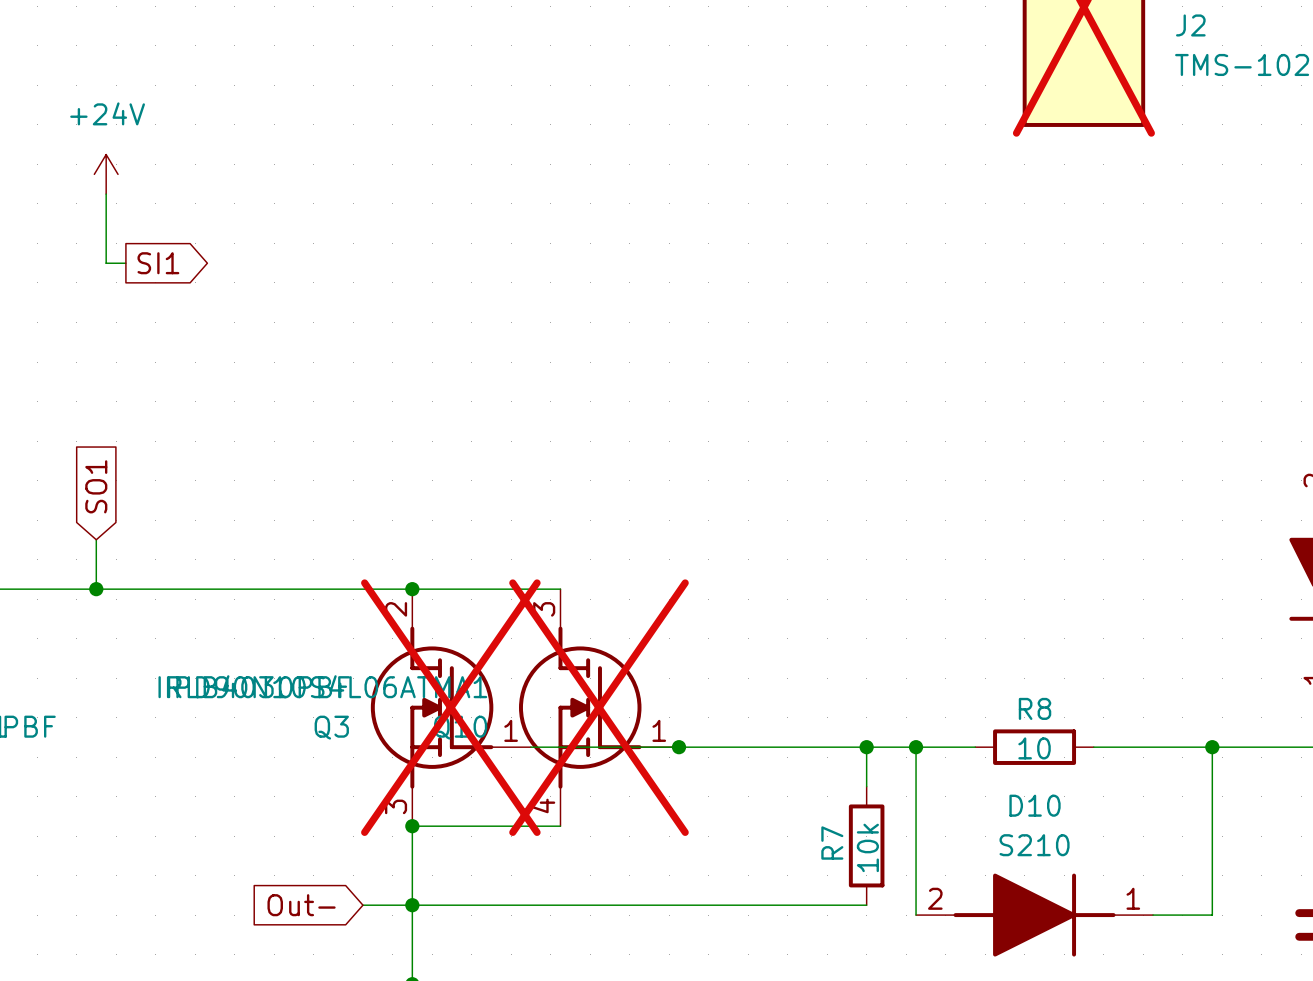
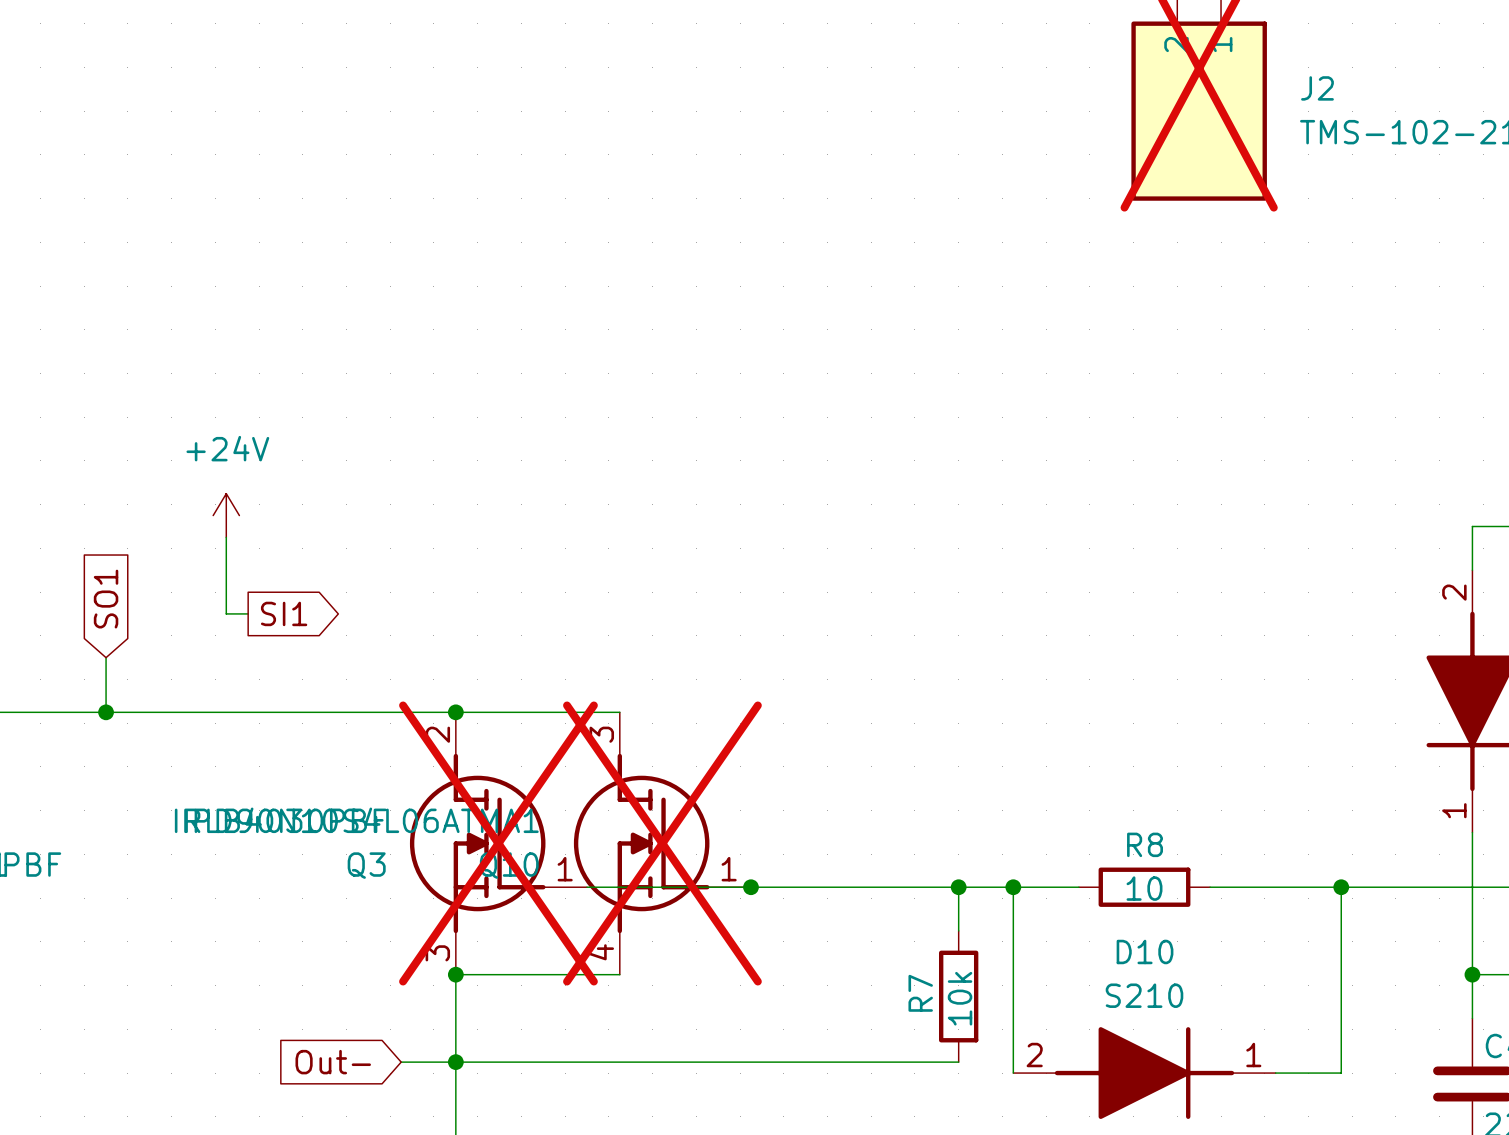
power symbol position: +24V (106, 174) -> +24V (226, 515)
wire: (106, 194) (106, 263) (125, 263) -> (226, 537) (226, 613) (248, 613)
global label position: SI1 (158, 263) -> SI1 (284, 613)

